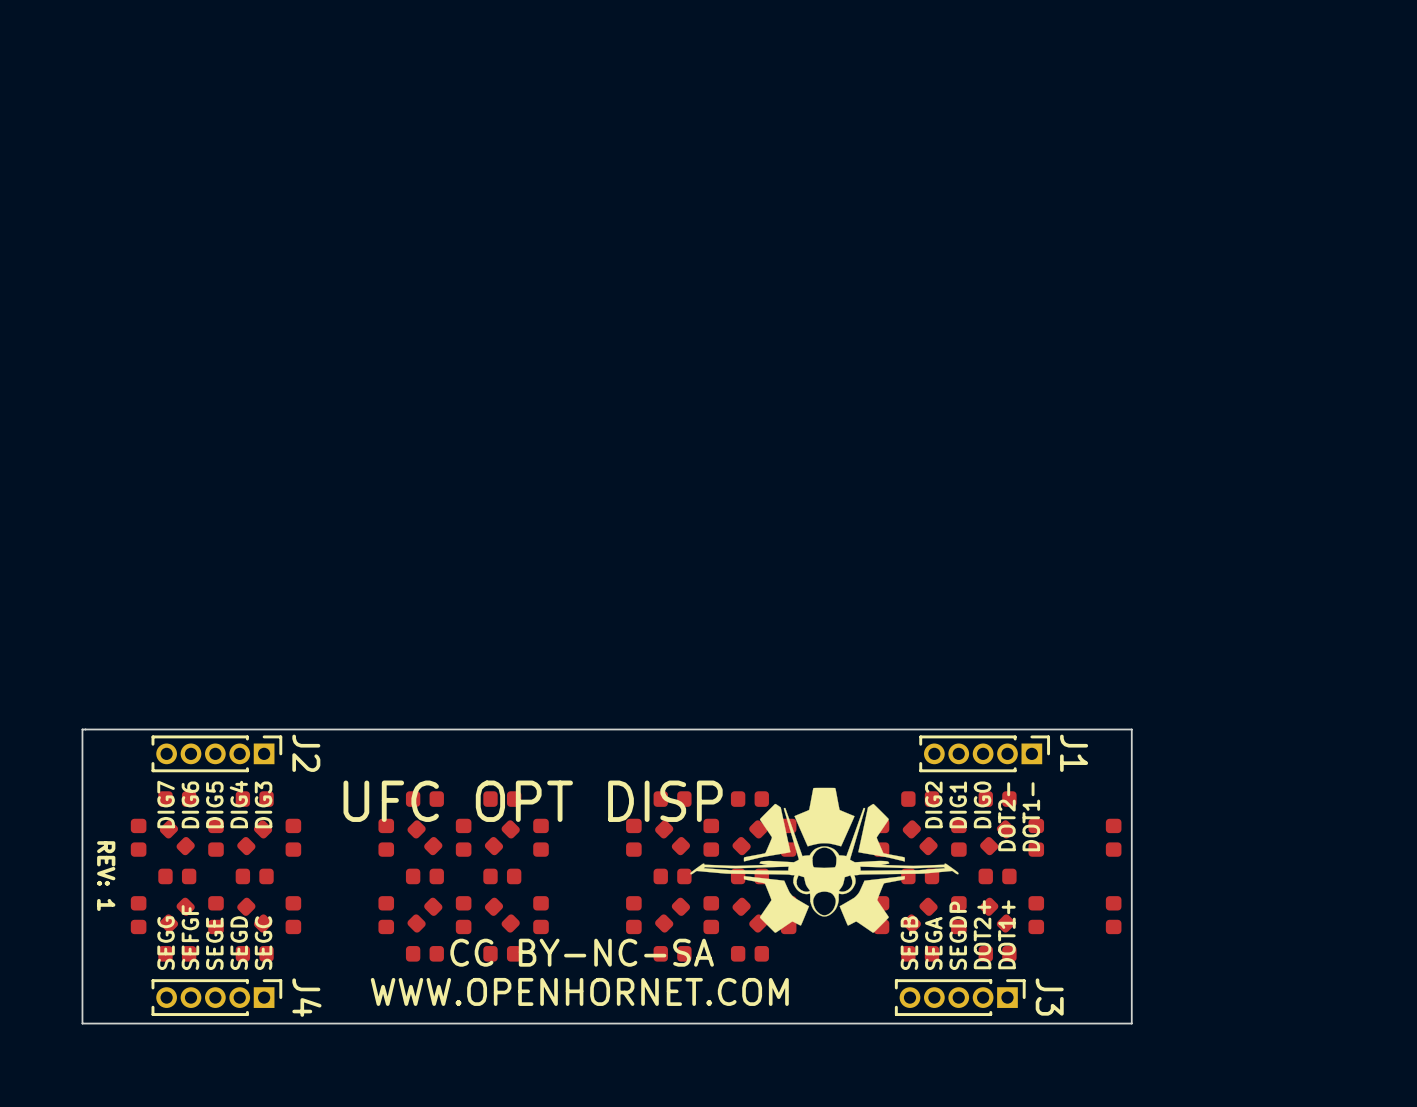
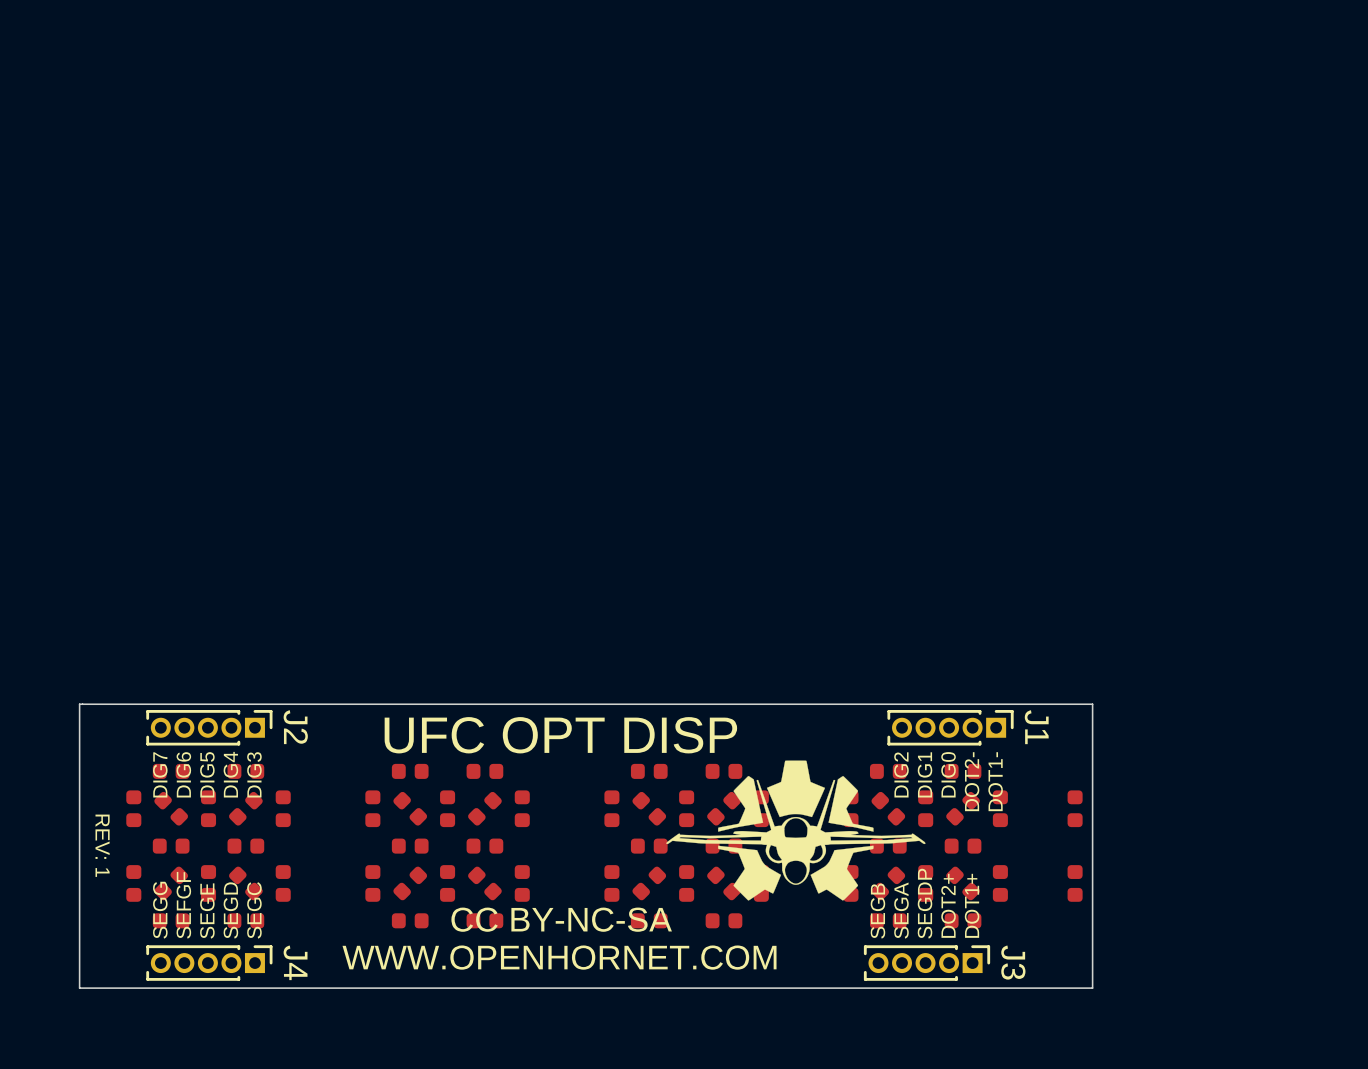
text position: UFC OPT DISP (533, 801) -> UFC OPT DISP (560, 735)

